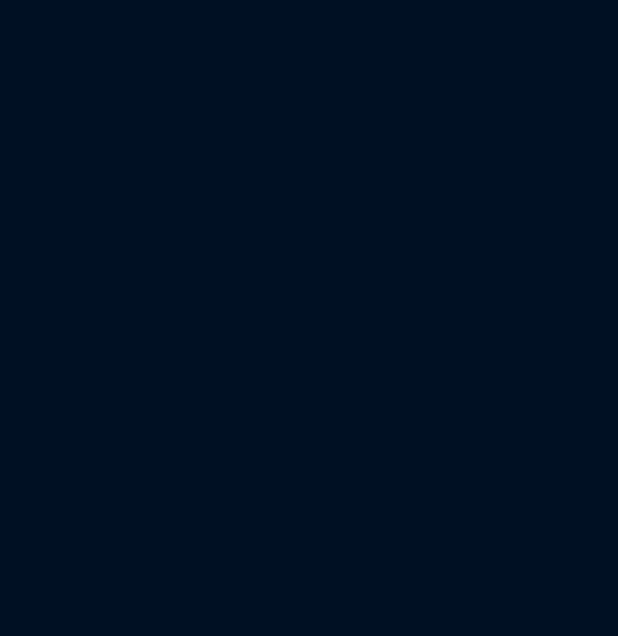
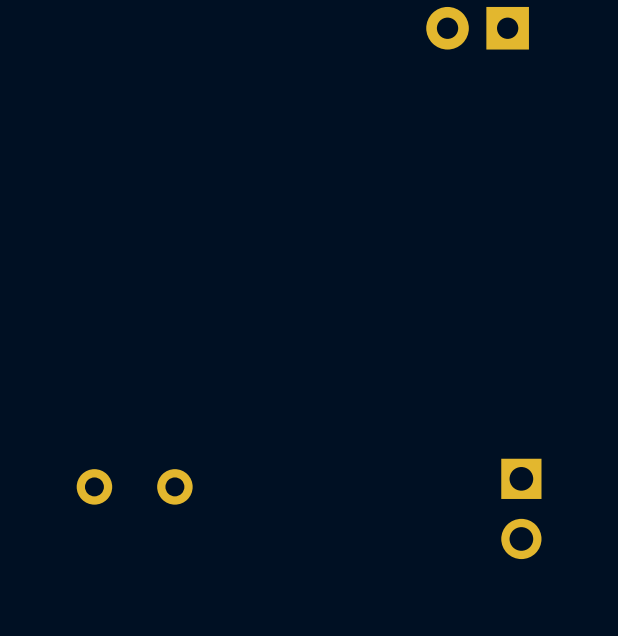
part: none -> (477, 28)
part: none -> (134, 486)
part: none -> (521, 508)

